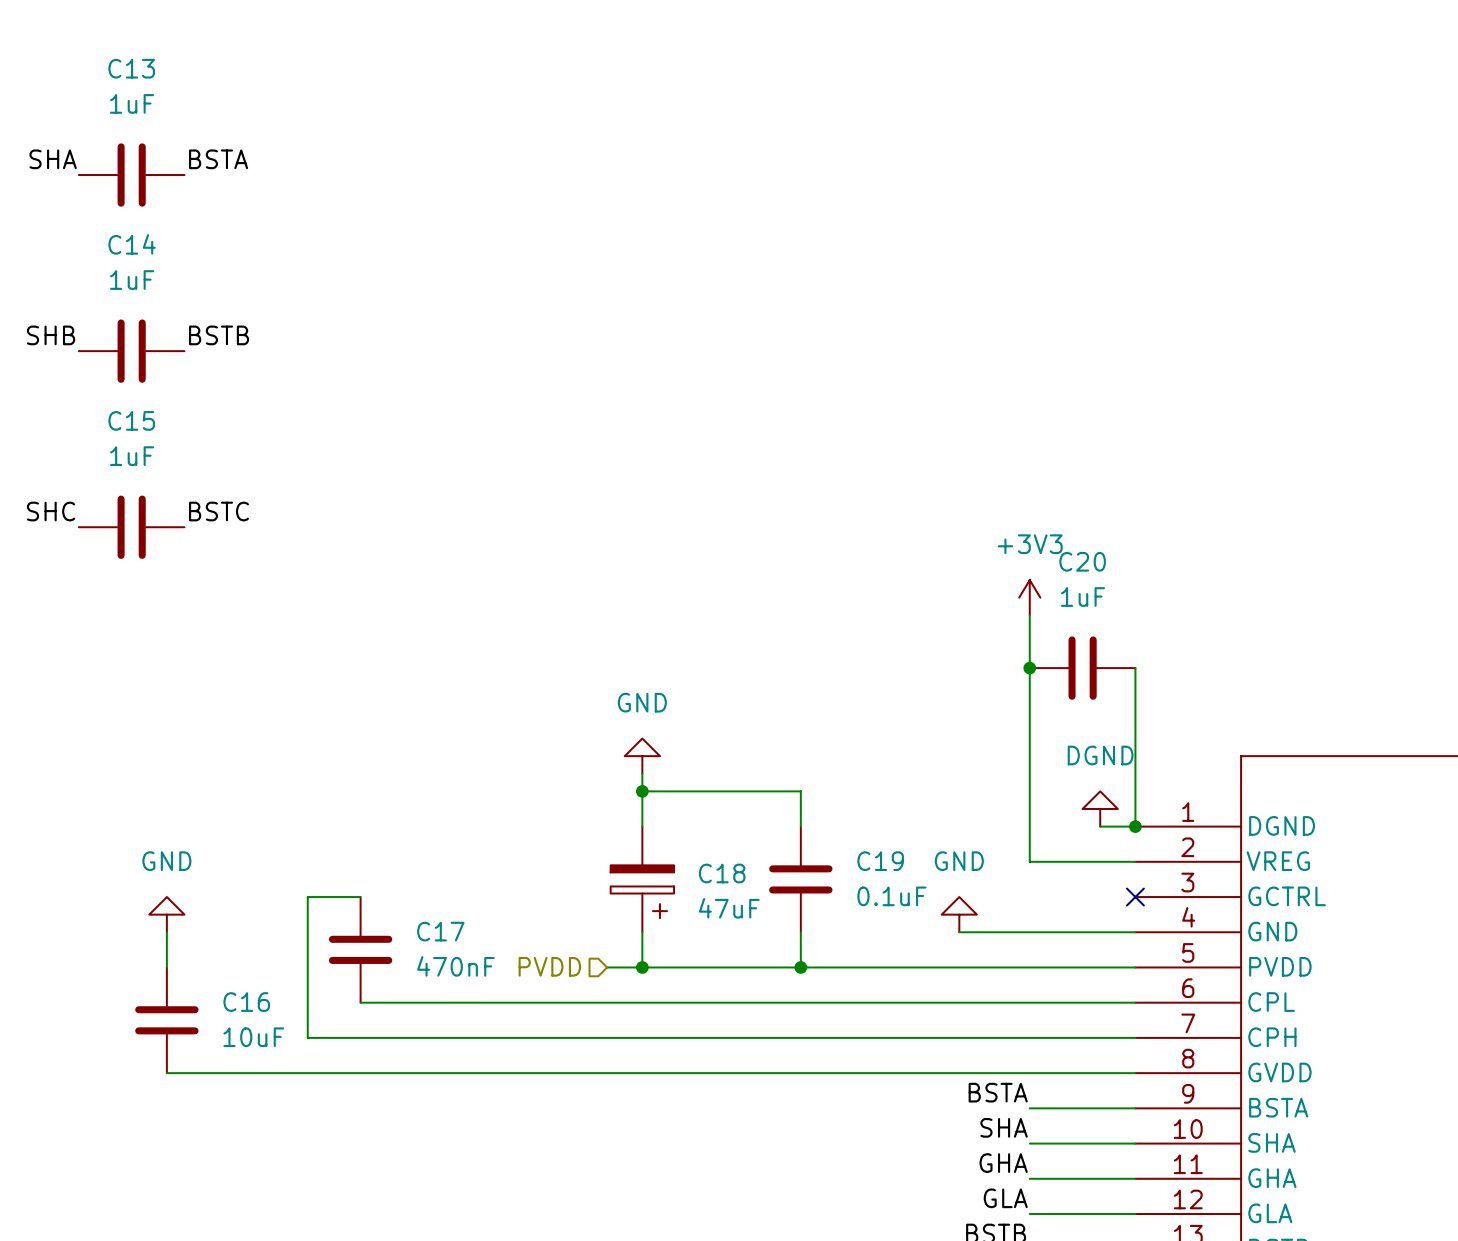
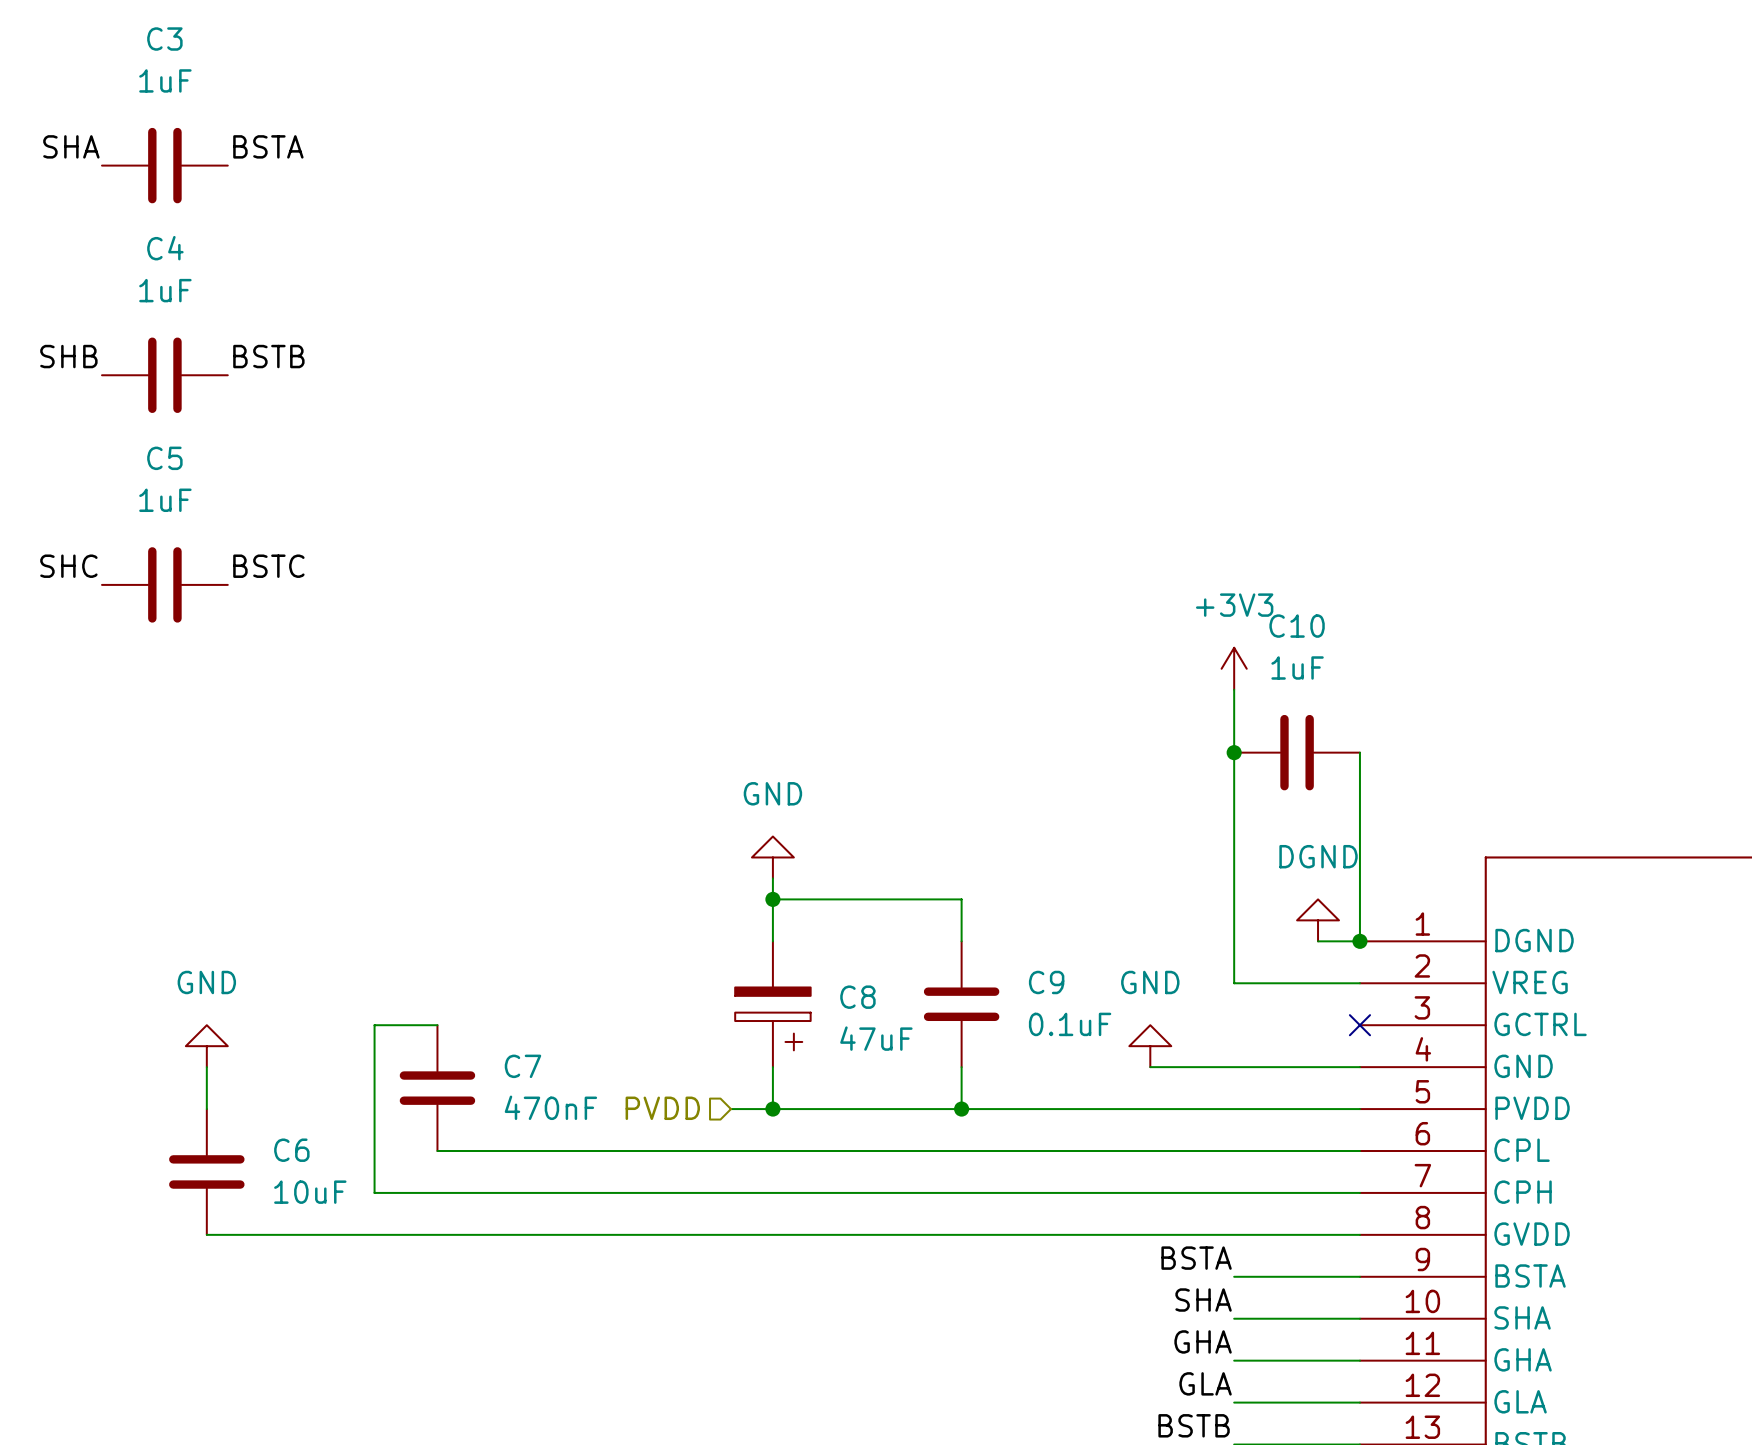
C13 name: C13 (131, 68) -> C3 (164, 39)
C14 name: C14 (132, 244) -> C4 (165, 248)
C15 name: C15 (131, 420) -> C5 (164, 458)
C20 name: C20 (1082, 561) -> C10 (1297, 626)
C19 name: C19 (880, 861) -> C9 (1046, 982)
C18 name: C18 (722, 873) -> C8 (857, 997)
C17 name: C17 (440, 931) -> C7 (522, 1066)
C16 name: C16 (246, 1002) -> C6 (291, 1150)

